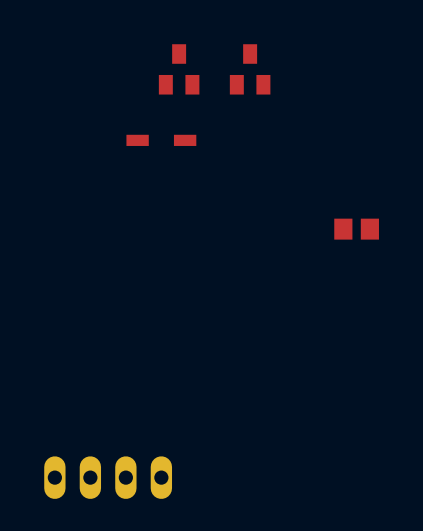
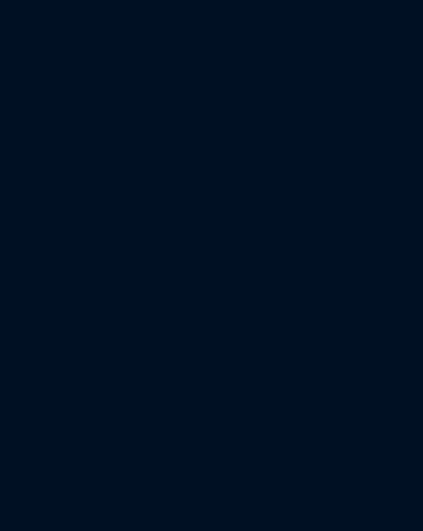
part: (179, 69) -> none
part: (250, 69) -> none
part: (161, 140) -> none
part: (356, 229) -> none
part: (108, 477) -> none

